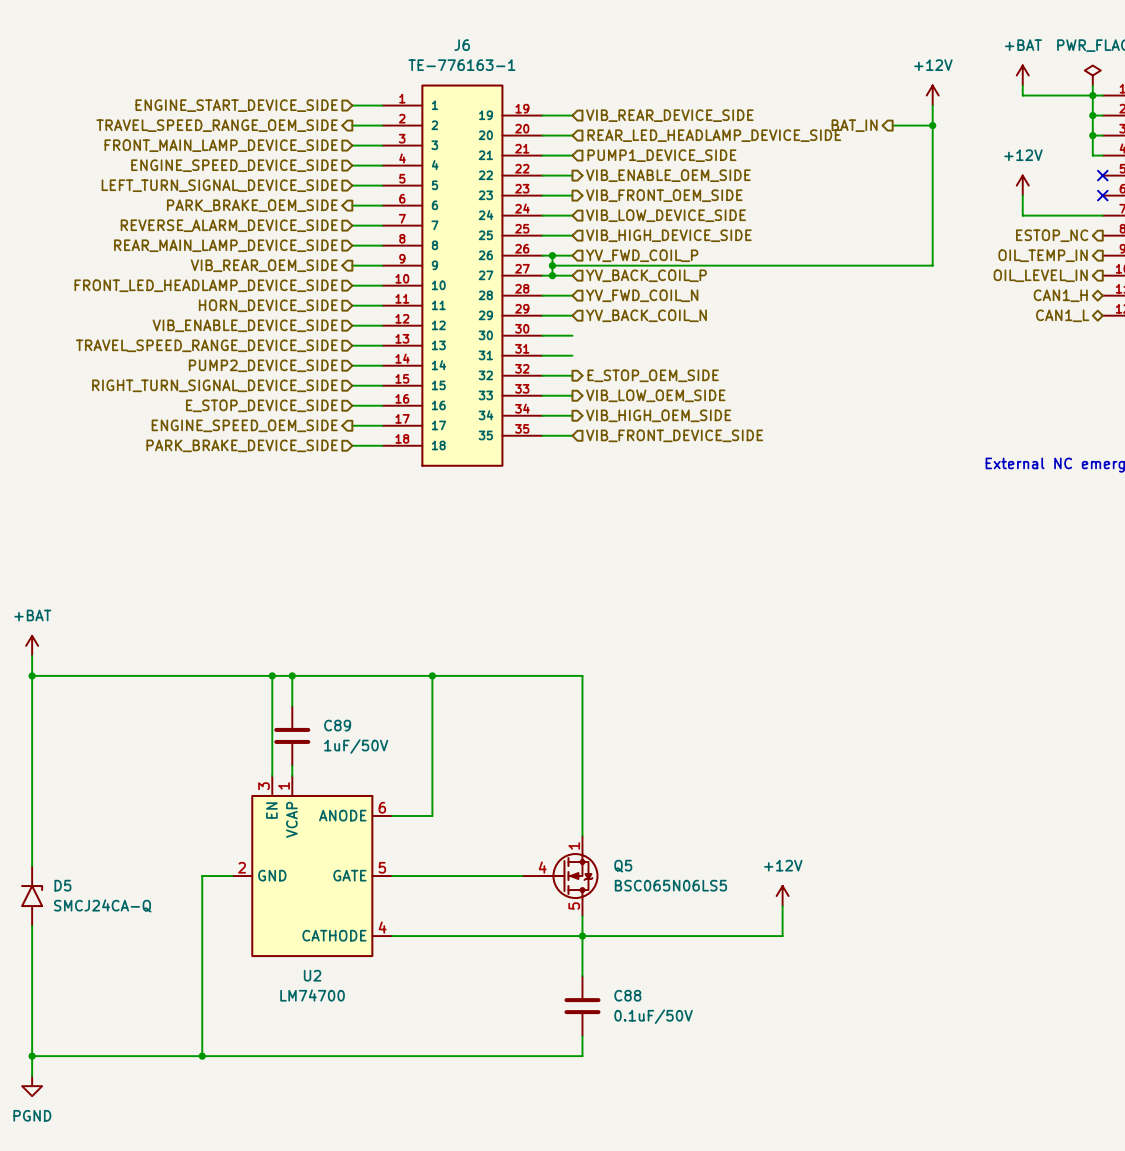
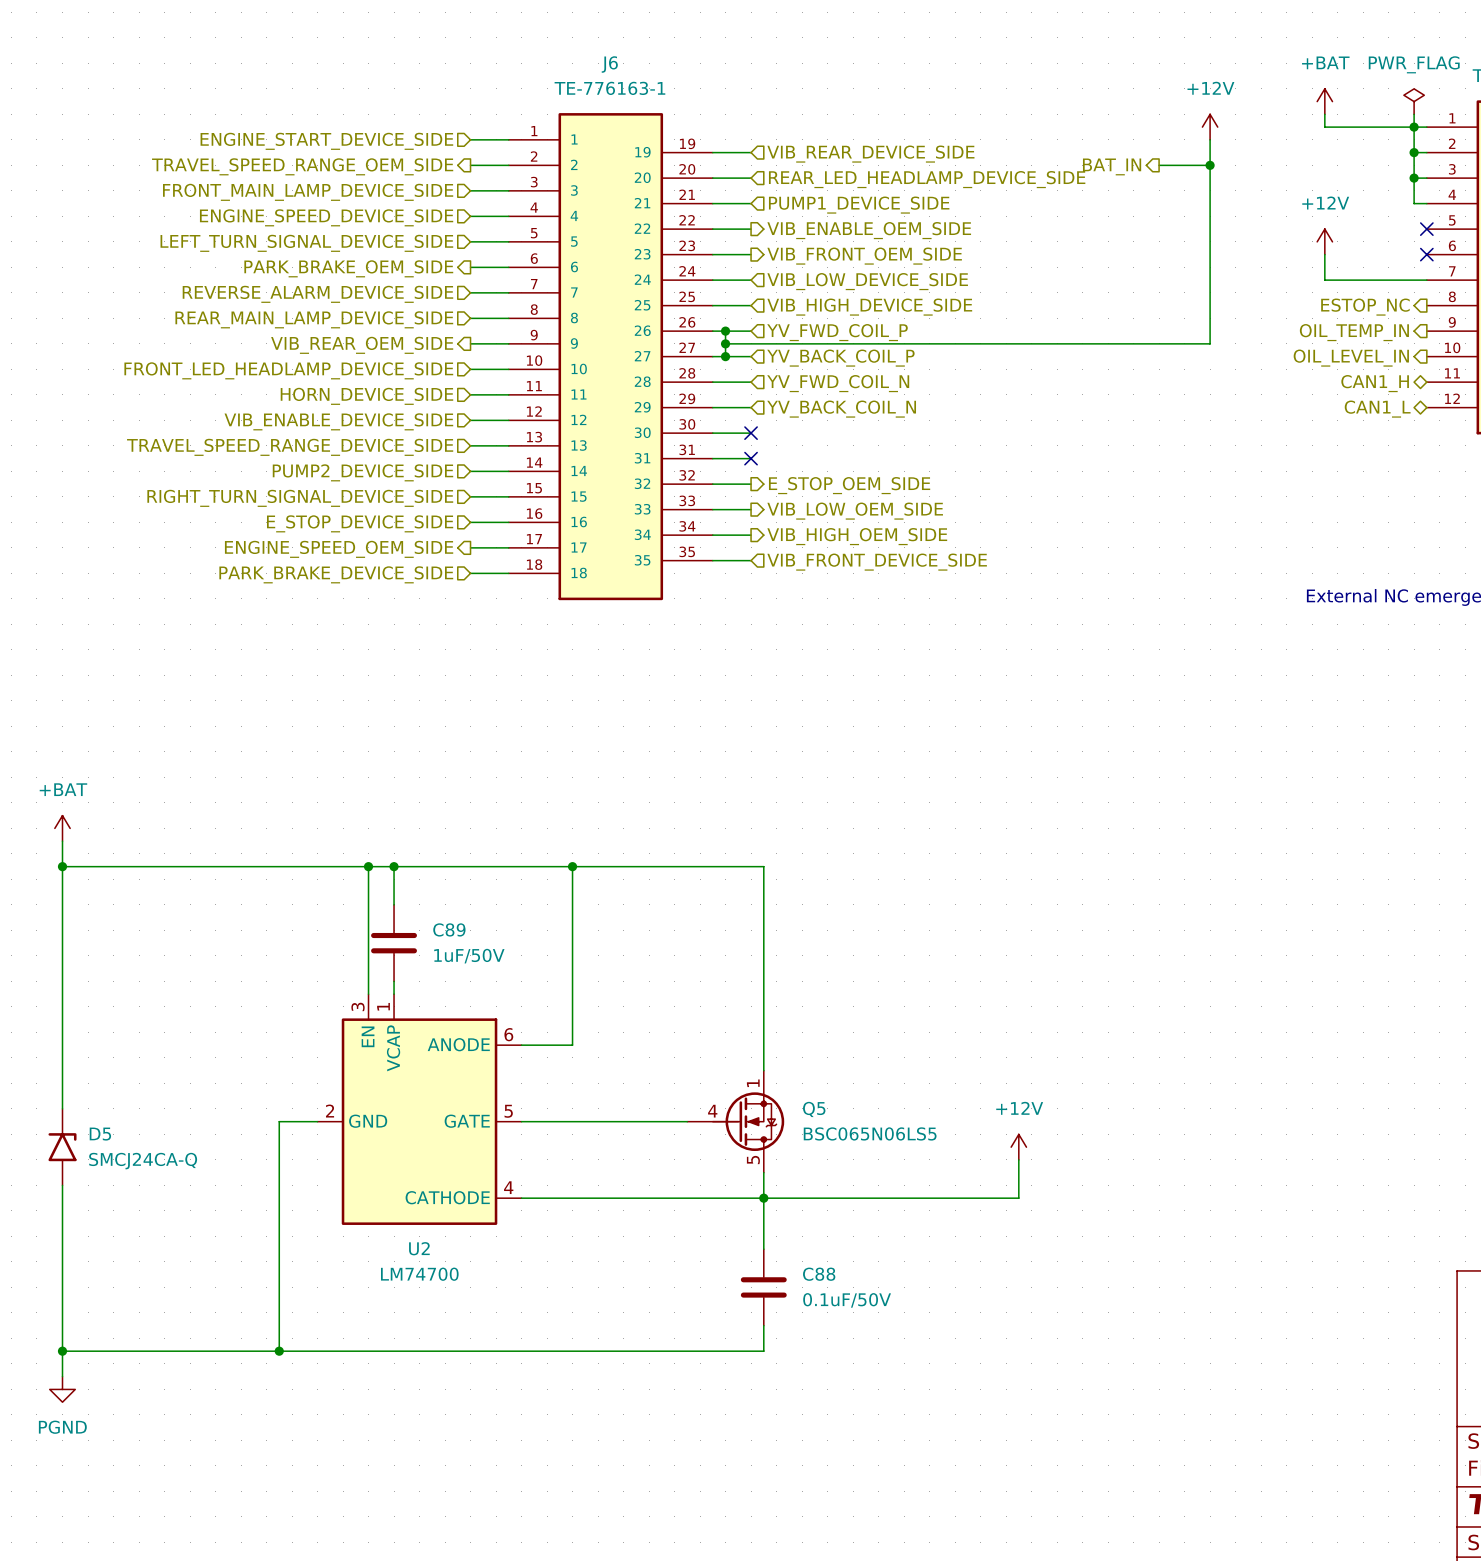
no-connect mark: none -> (751, 433)
no-connect mark: none -> (751, 458)

